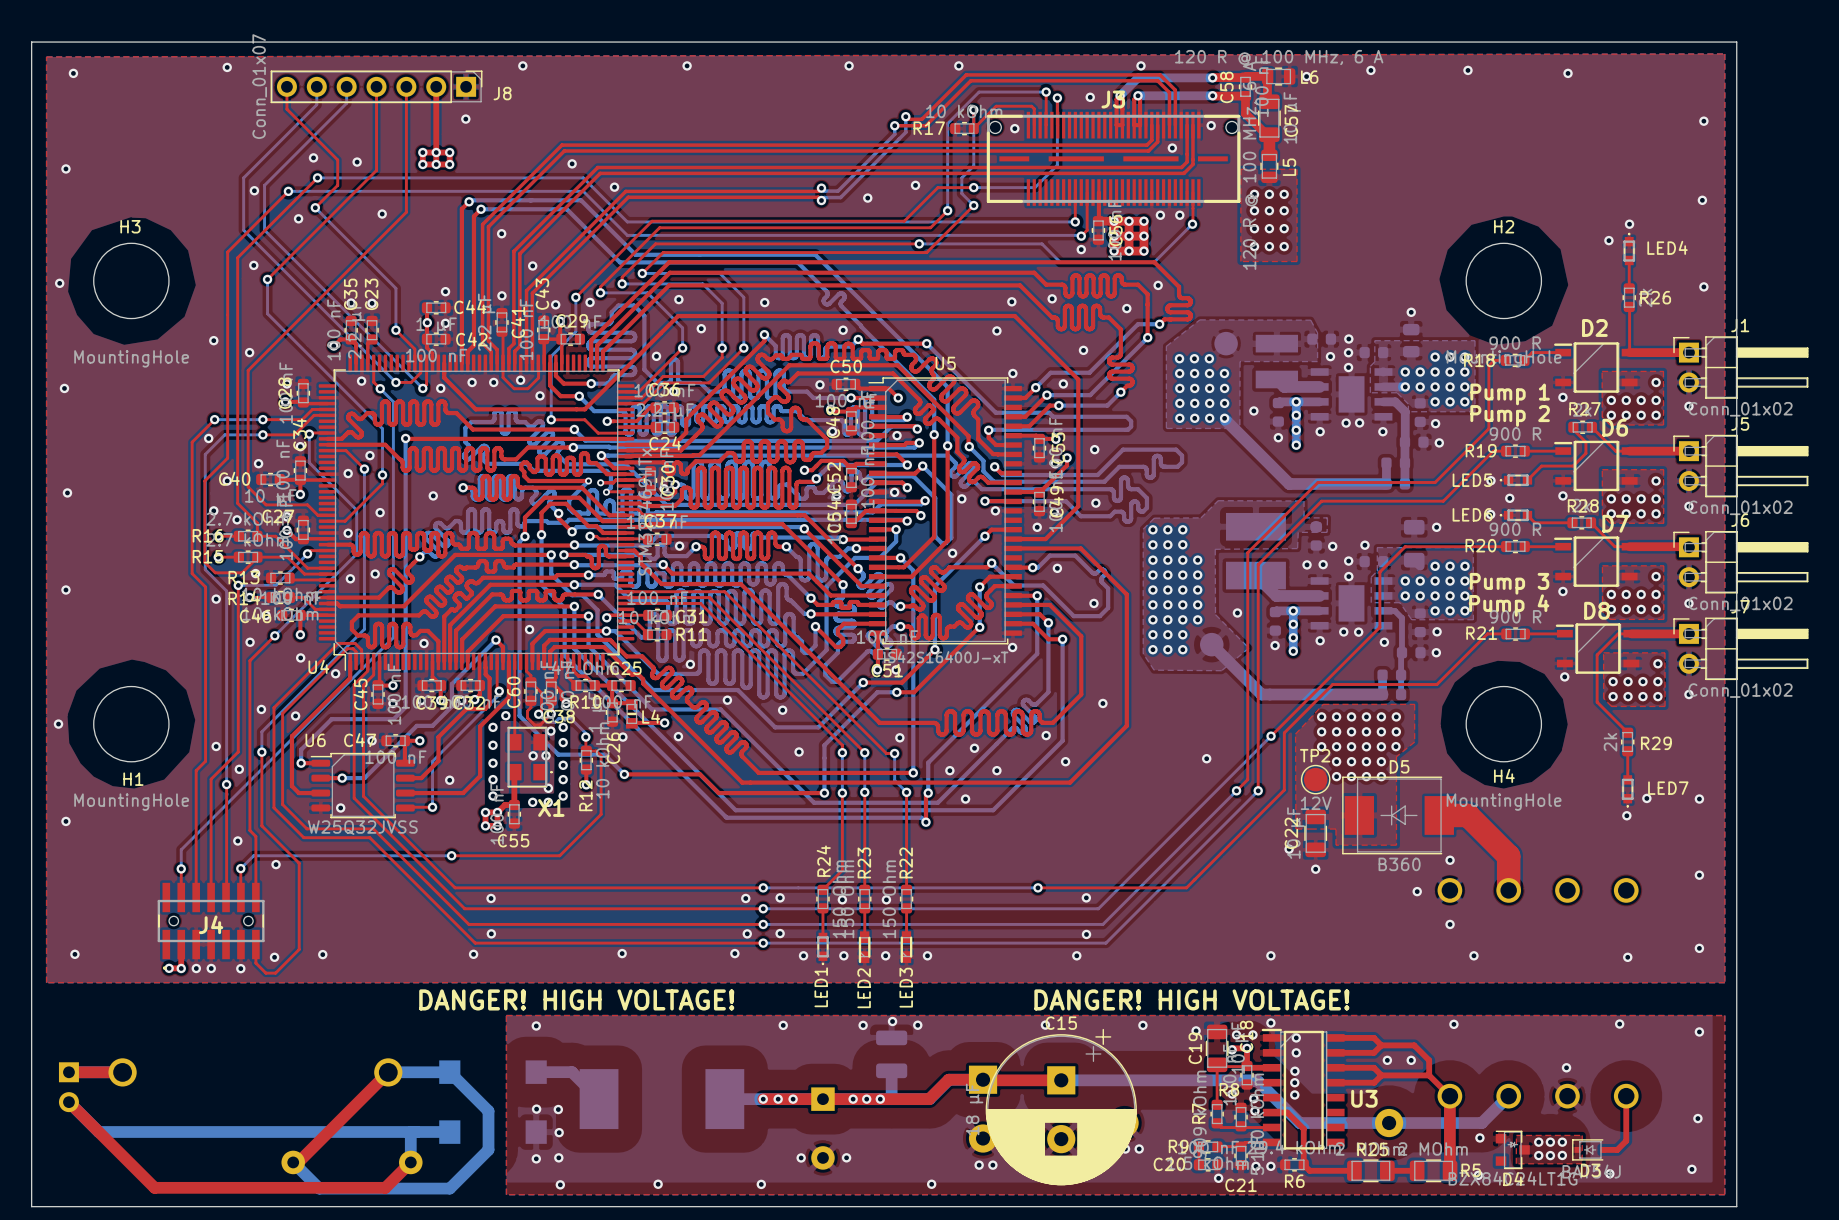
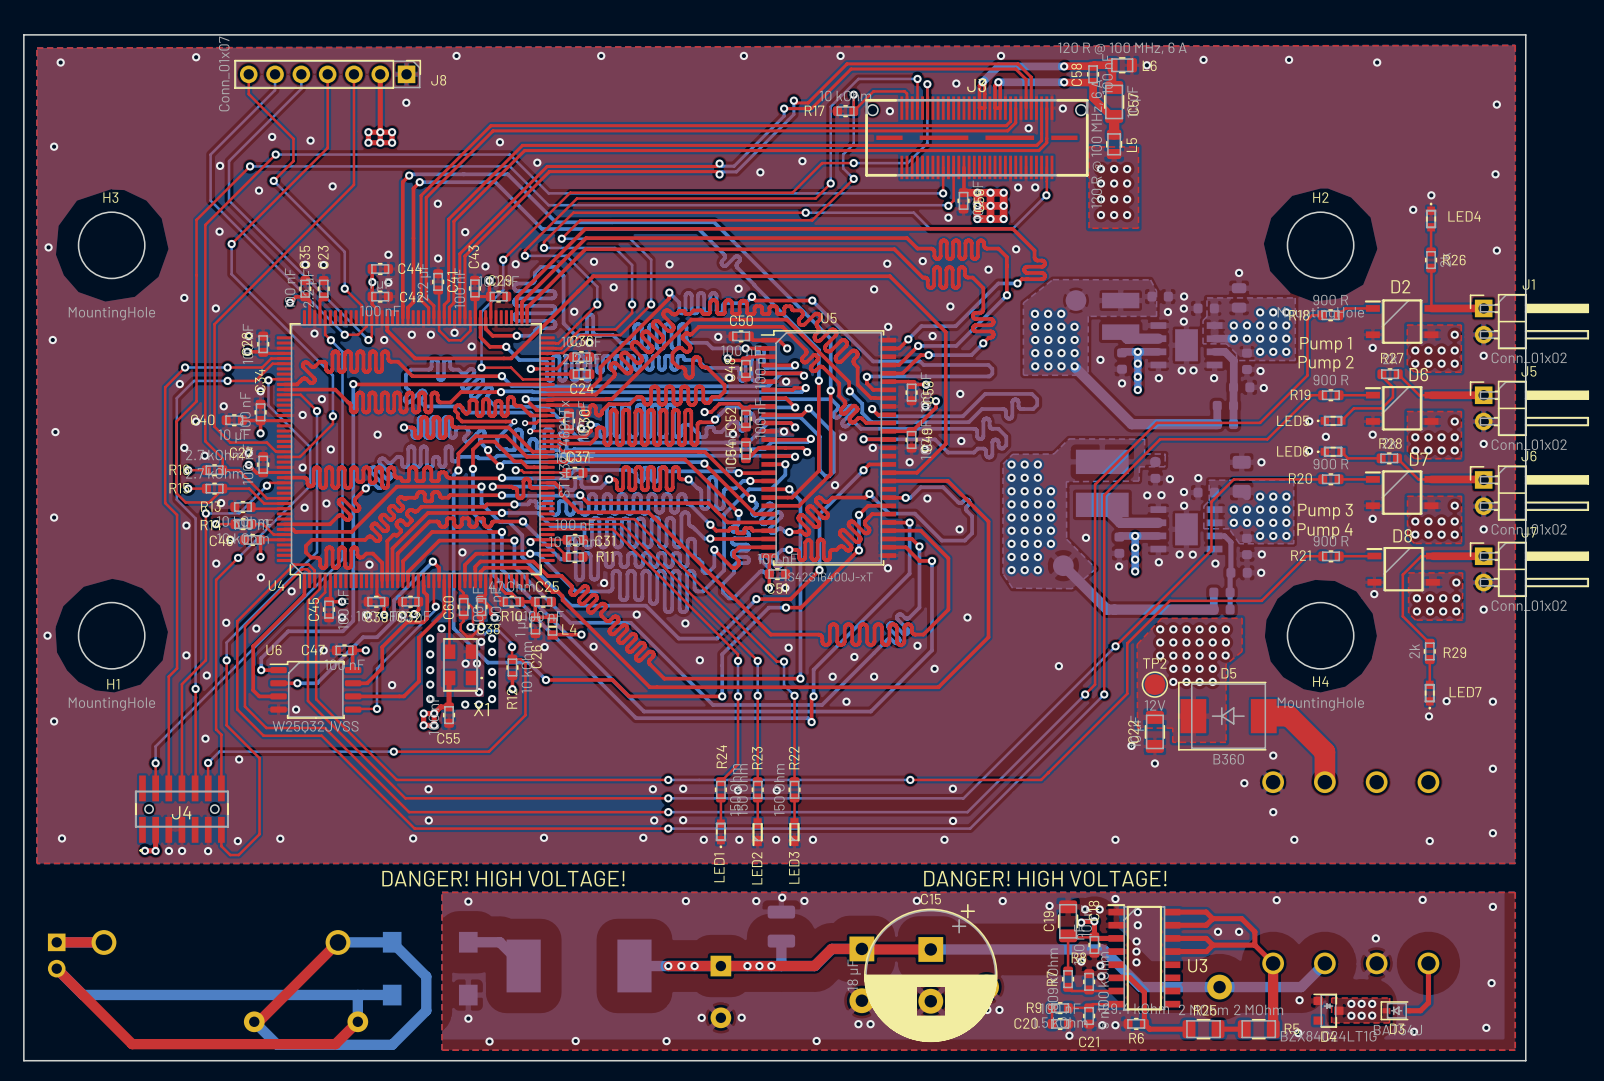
via: (536, 1109) -> none
via: (558, 1109) -> none
via: (559, 1132) -> none
via: (558, 1157) -> none

